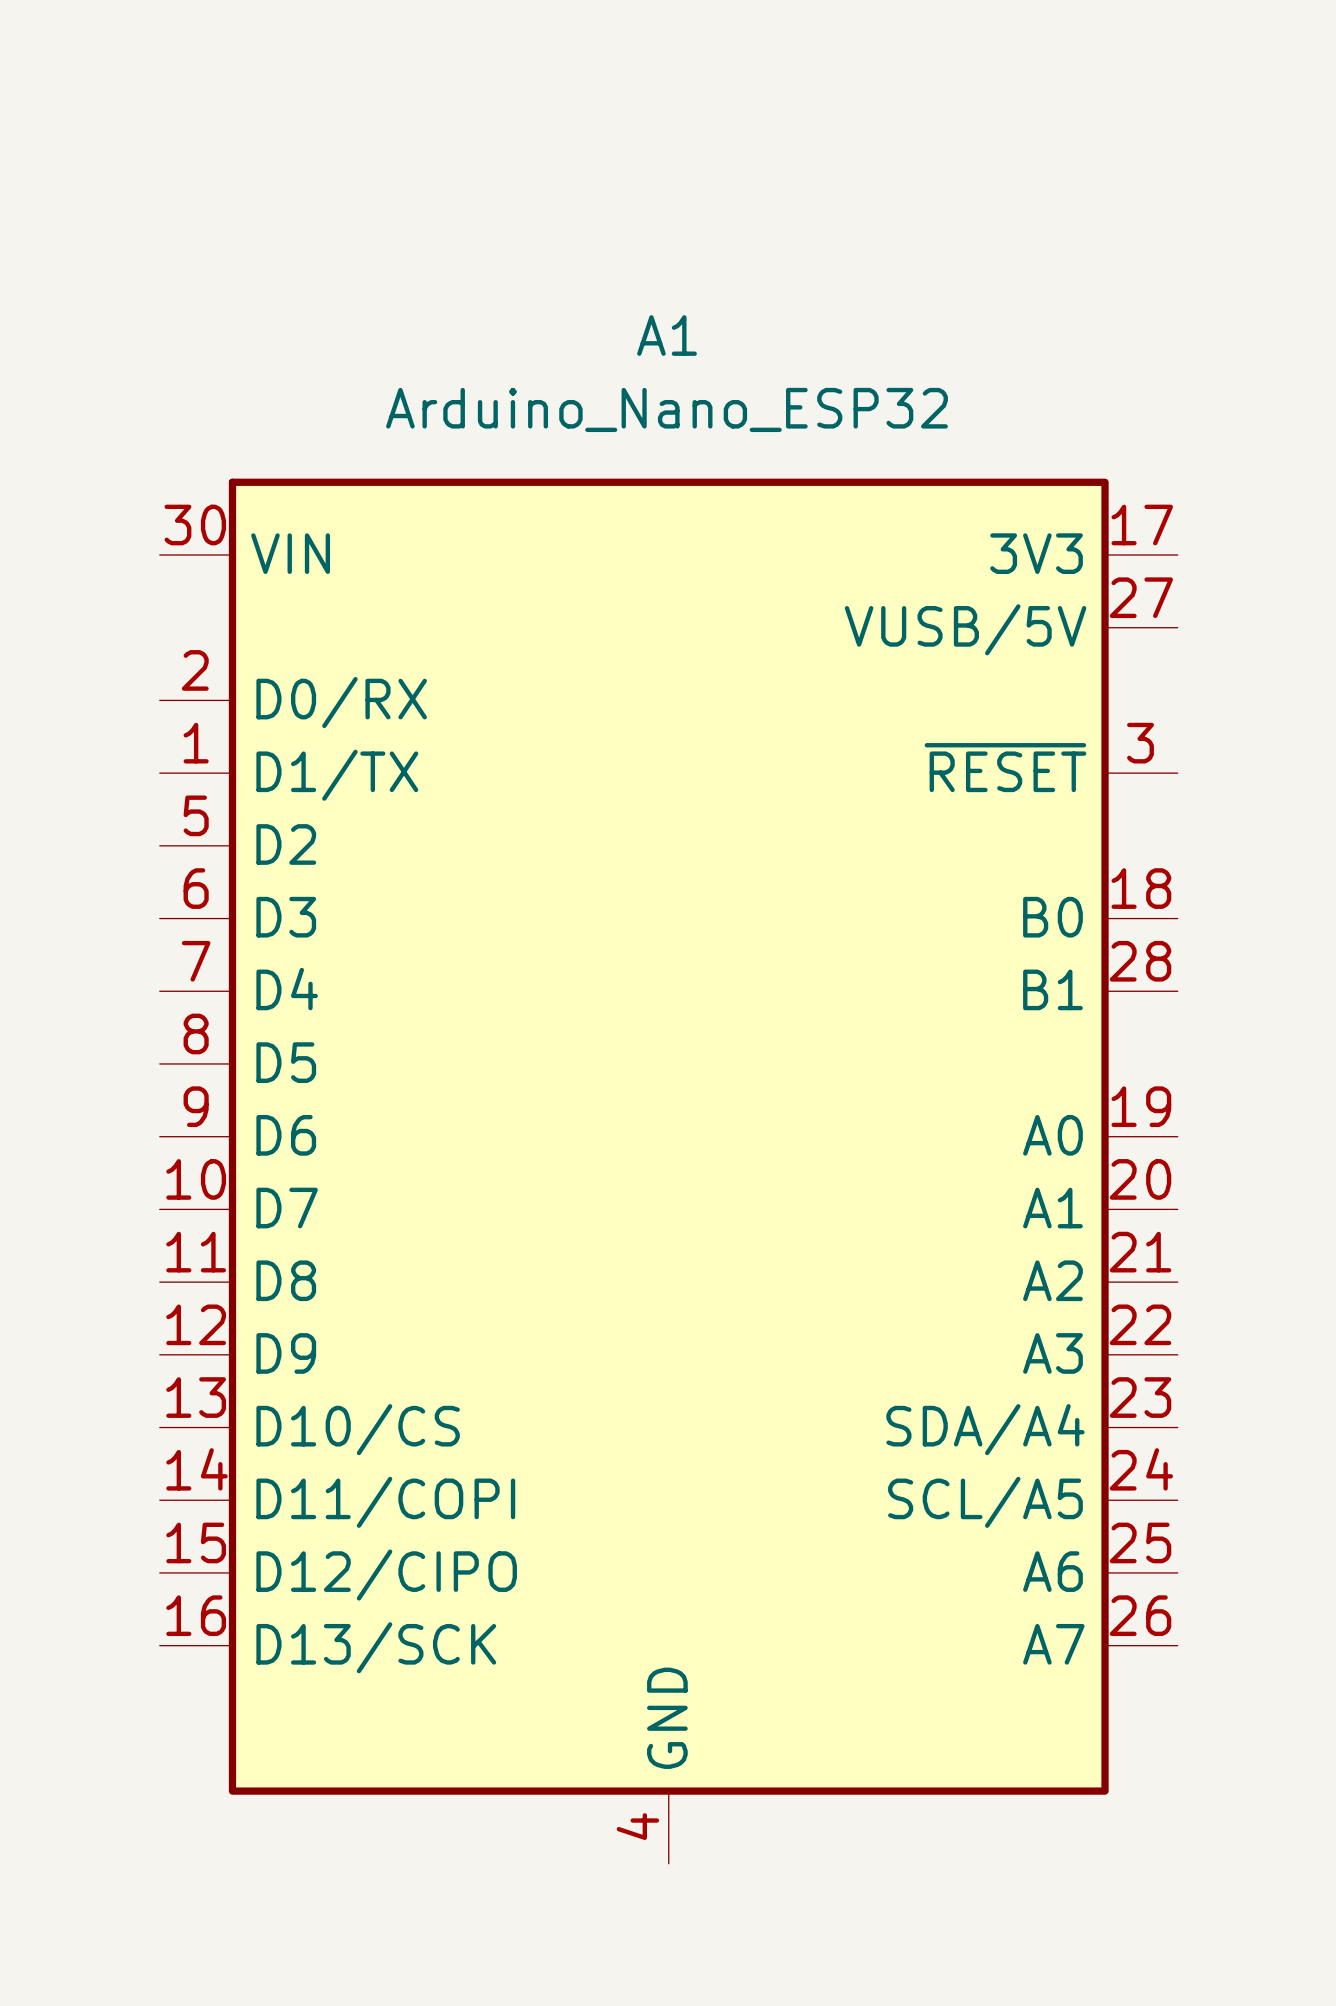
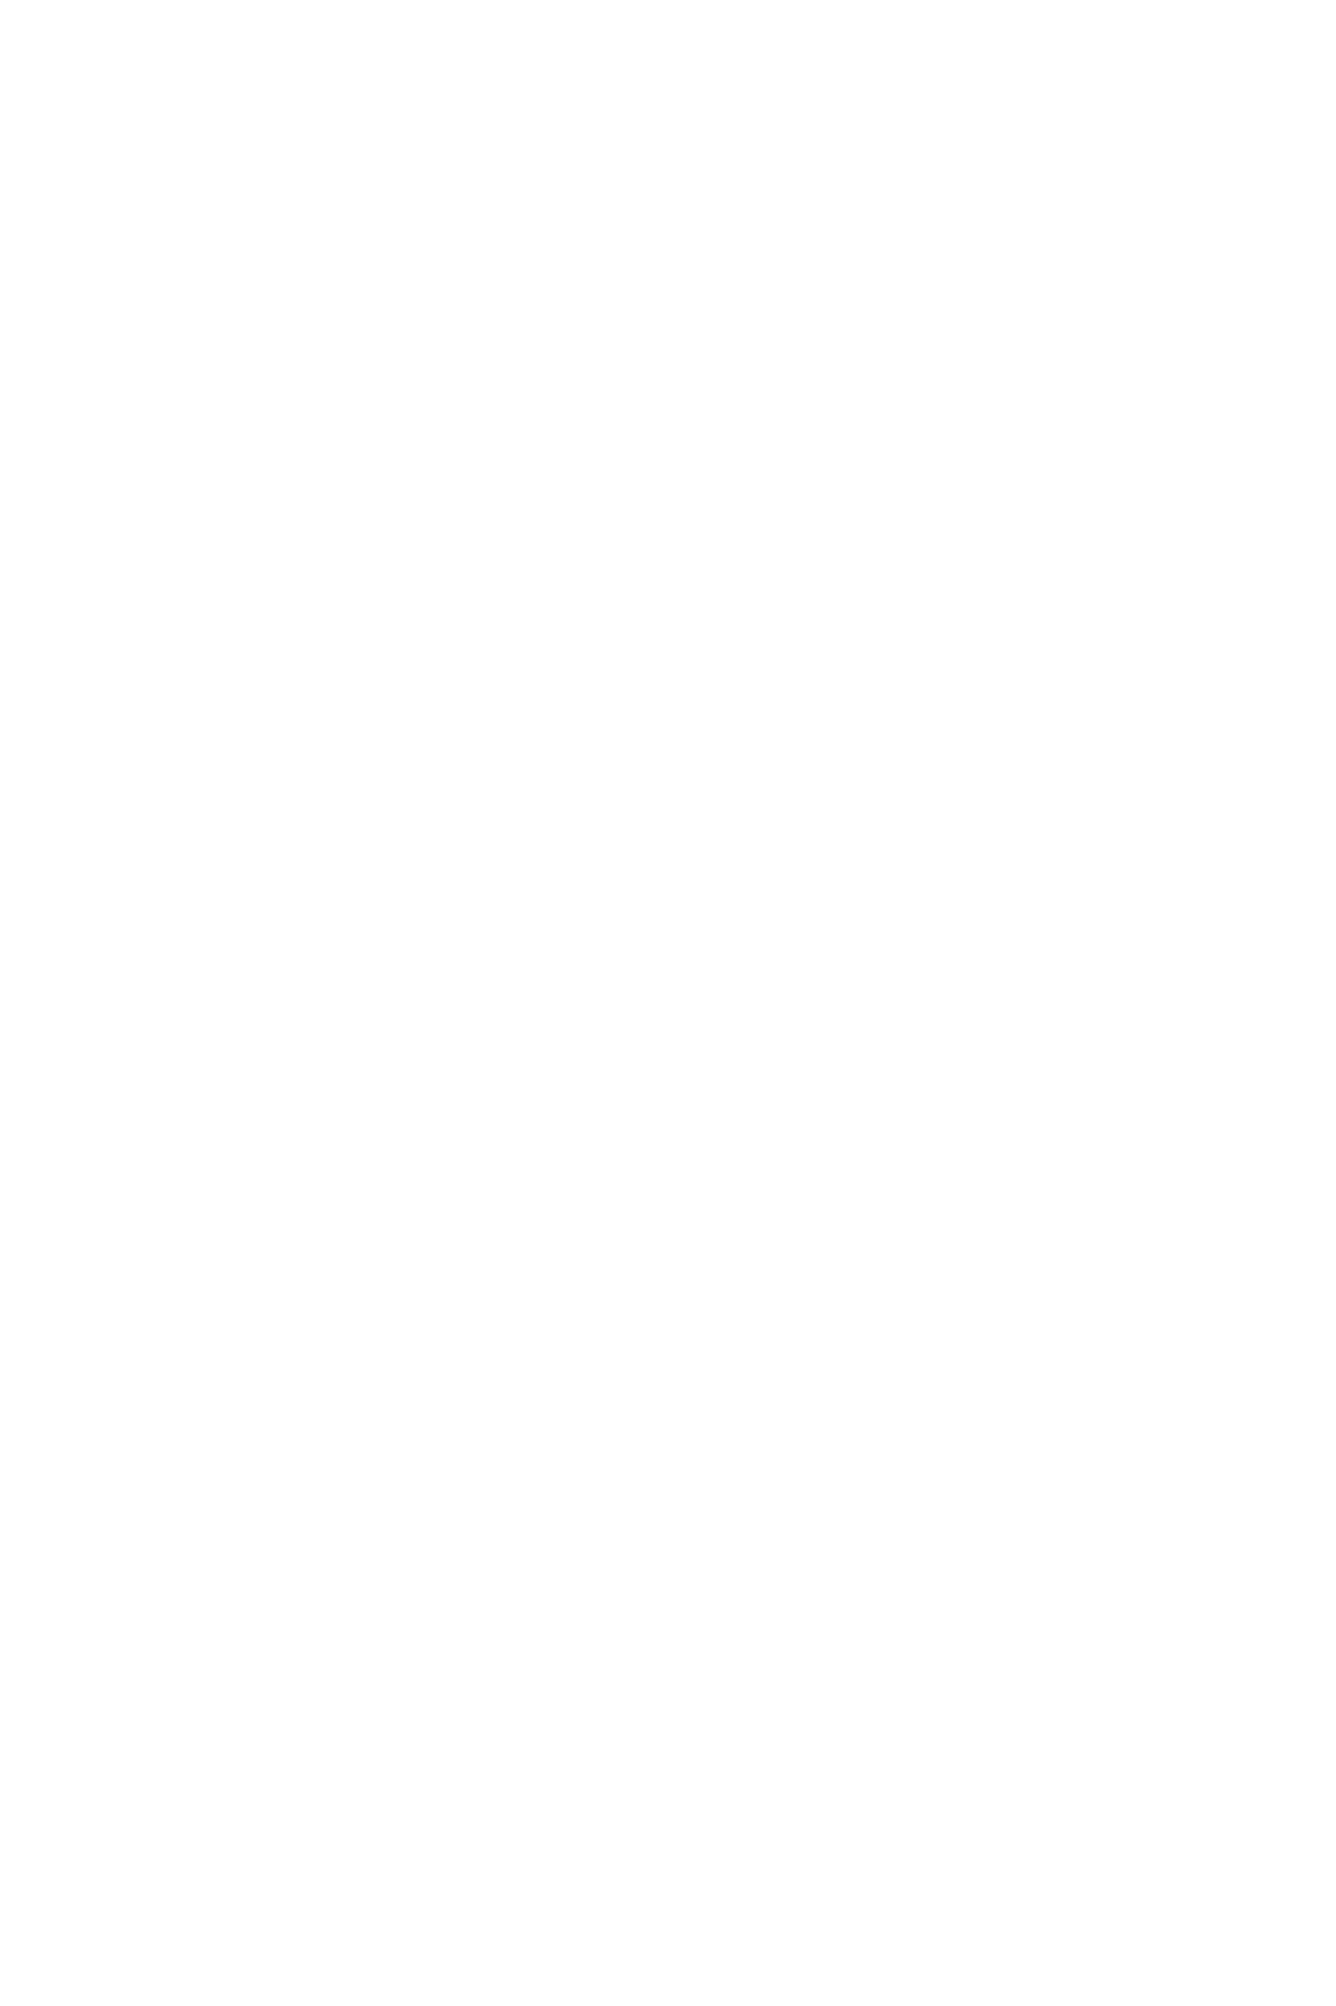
A1: Arduino_Nano_ESP32 (668, 1171) -> none

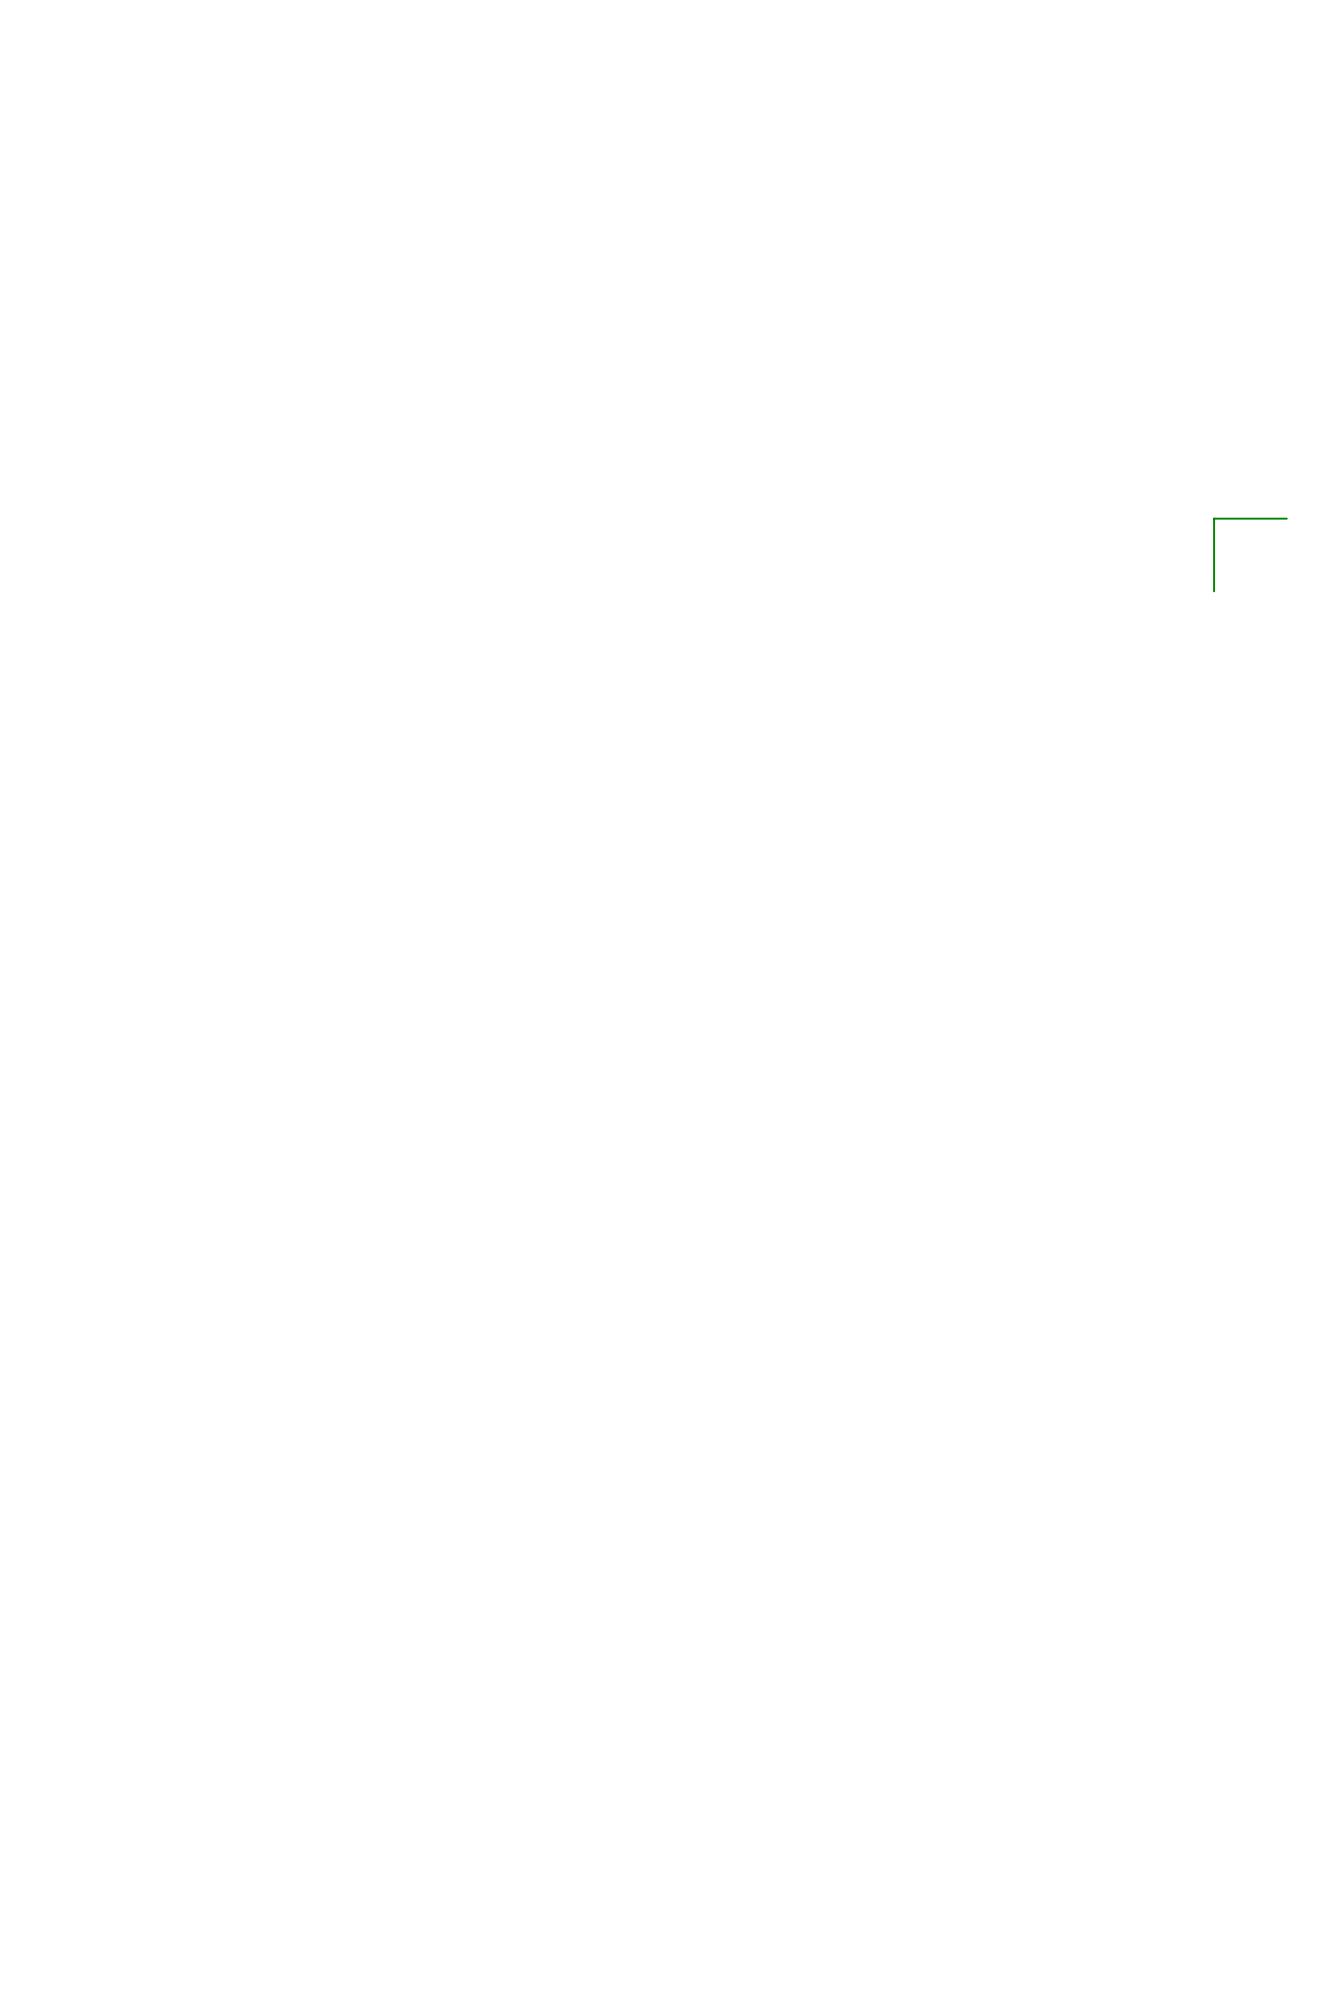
wire: none -> (1286, 518) (1214, 518) (1214, 591)

